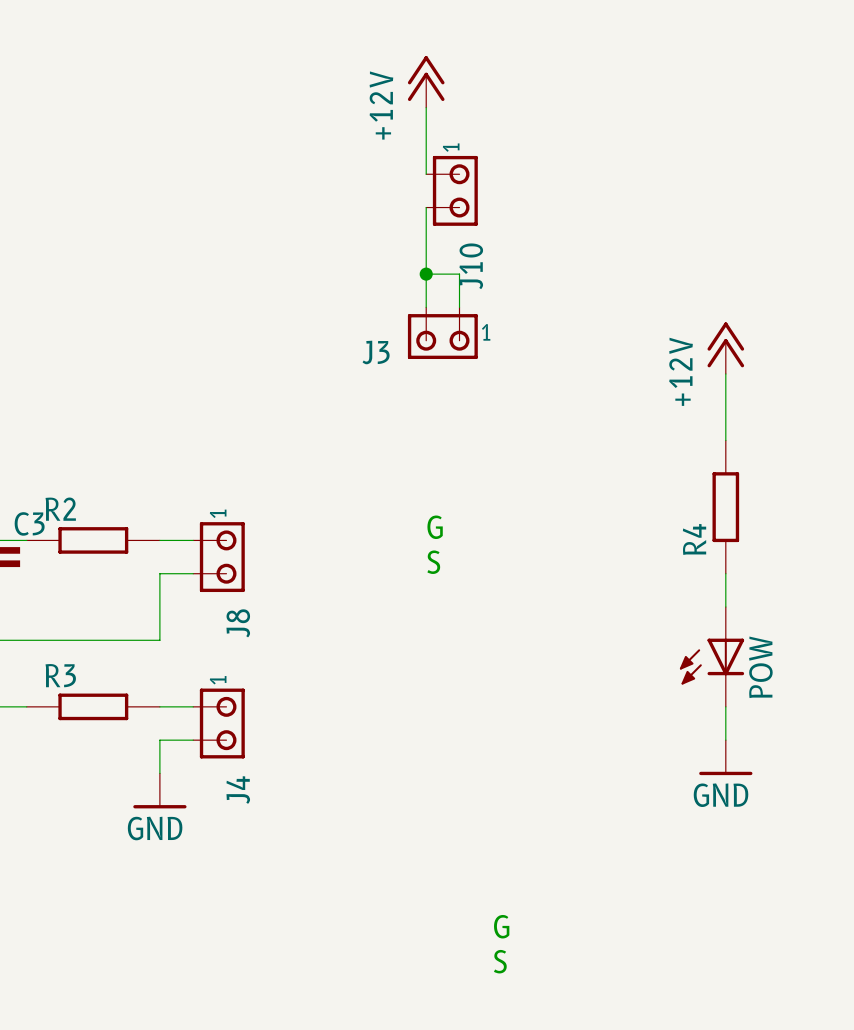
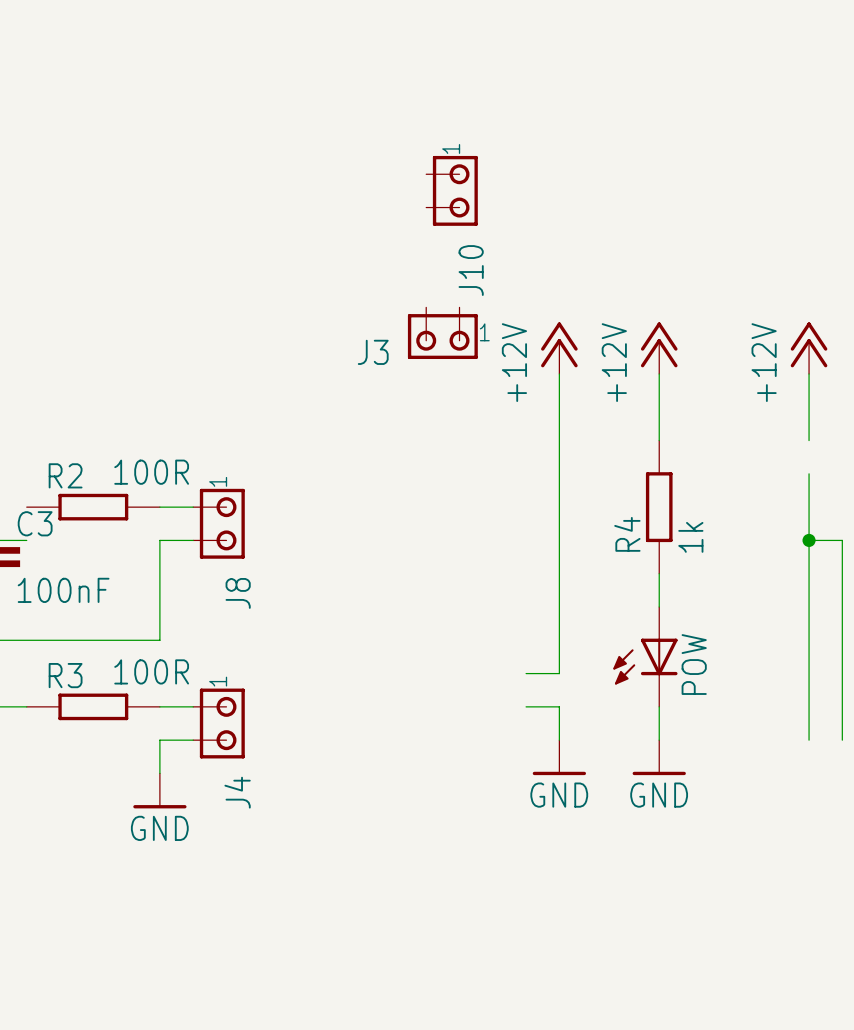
power symbol: +12V (426, 81) -> none
wire: (426, 107) (426, 174) -> none
wire: (426, 207) (426, 307) -> none
wire: (426, 274) (459, 274) (459, 307) -> none
junction: (426, 274) -> none
power symbol: none -> +12V (559, 348)
power symbol: none -> +12V (659, 348)
power symbol: +12V (725, 348) -> none
power symbol: none -> +12V (809, 348)
wire: none -> (559, 373) (559, 673) (526, 673)
wire: (725, 373) (725, 440) -> (659, 373) (659, 440)
wire: none -> (809, 373) (809, 440)
R2 value: none -> 100R (151, 472)
wire: none -> (809, 473) (809, 740)
wire: none -> (159, 507) (193, 507)
R4 position: (725, 507) -> (659, 507)
text: G (435, 527) -> none
R4 value: none -> 1k (690, 537)
R2 position: (93, 540) -> (93, 507)
wire: none -> (809, 540) (842, 540) (842, 740)
junction: none -> (809, 540)
J8 position: (218, 557) -> (218, 523)
text: S (433, 562) -> none
wire: (159, 573) (193, 573) -> (159, 573) (159, 540)
wire: (725, 573) (725, 607) -> (659, 573) (659, 607)
C3 value: none -> 100nF (63, 590)
POW position: (712, 656) -> (645, 656)
R3 value: none -> 100R (151, 671)
wire: none -> (526, 706) (559, 706) (559, 740)
wire: (725, 706) (725, 740) -> (659, 706) (659, 740)
power symbol: none -> GND (559, 757)
power symbol position: GND (725, 757) -> GND (659, 757)
text: G (501, 926) -> none
text: S (500, 961) -> none

